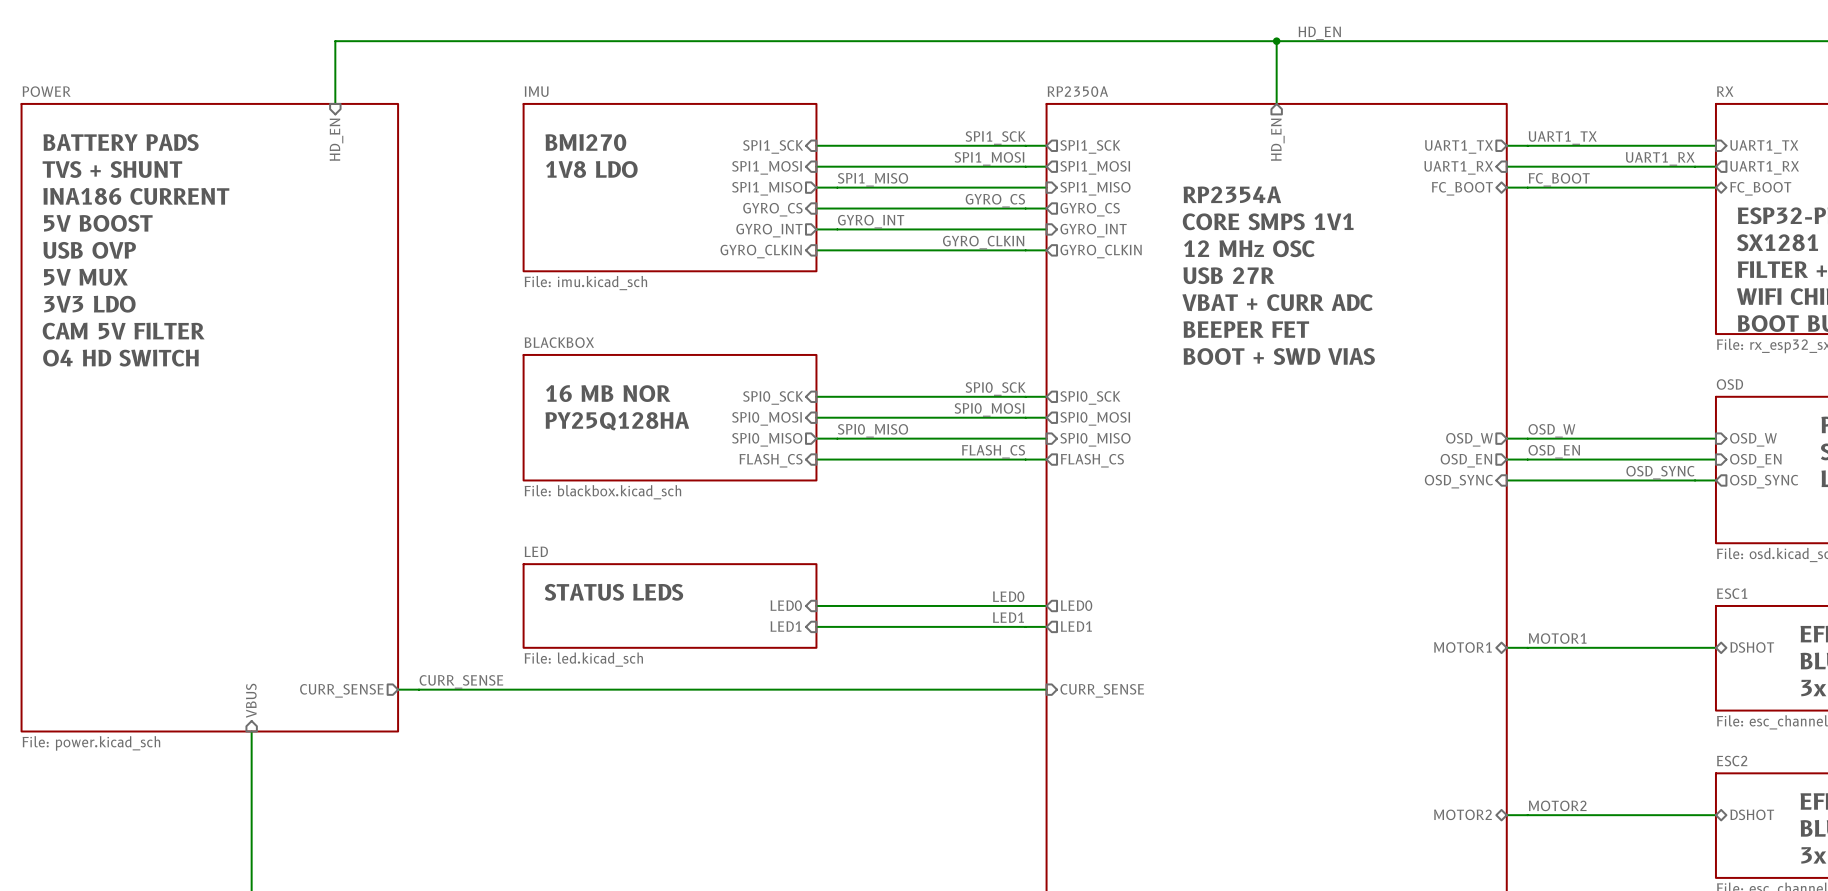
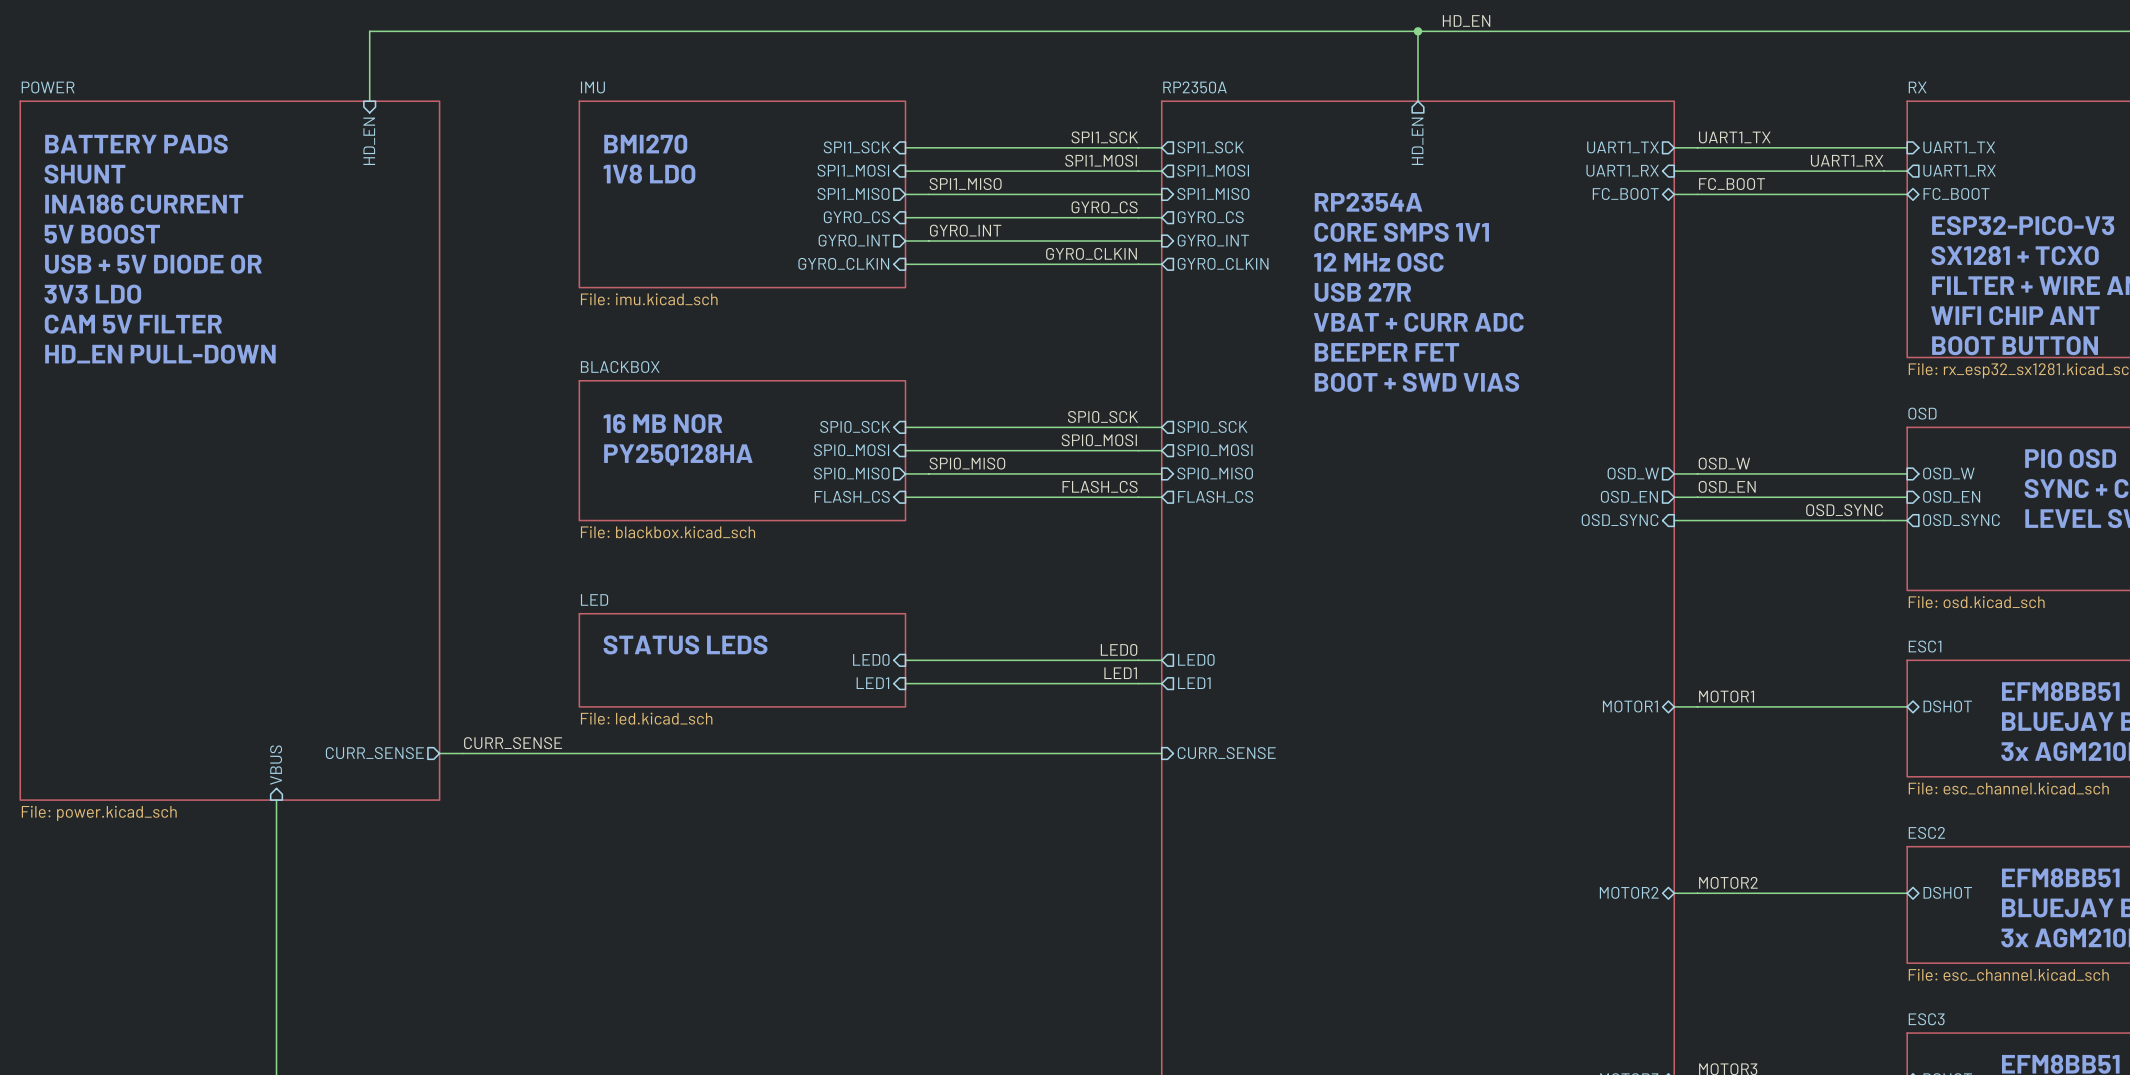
text: TVS + SHUNT (112, 169) -> SHUNT (84, 174)
text: USB OVP (89, 250) -> USB + 5V DIODE OR (153, 264)
text: 5V MUX (85, 277) -> 3V3 LDO (92, 294)
text: 3V3 LDO (89, 304) -> CAM 5V FILTER (133, 324)
text: CAM 5V FILTER (123, 331) -> HD_EN PULL-DOWN (160, 354)
text: O4 HD SWITCH (120, 358) -> none

